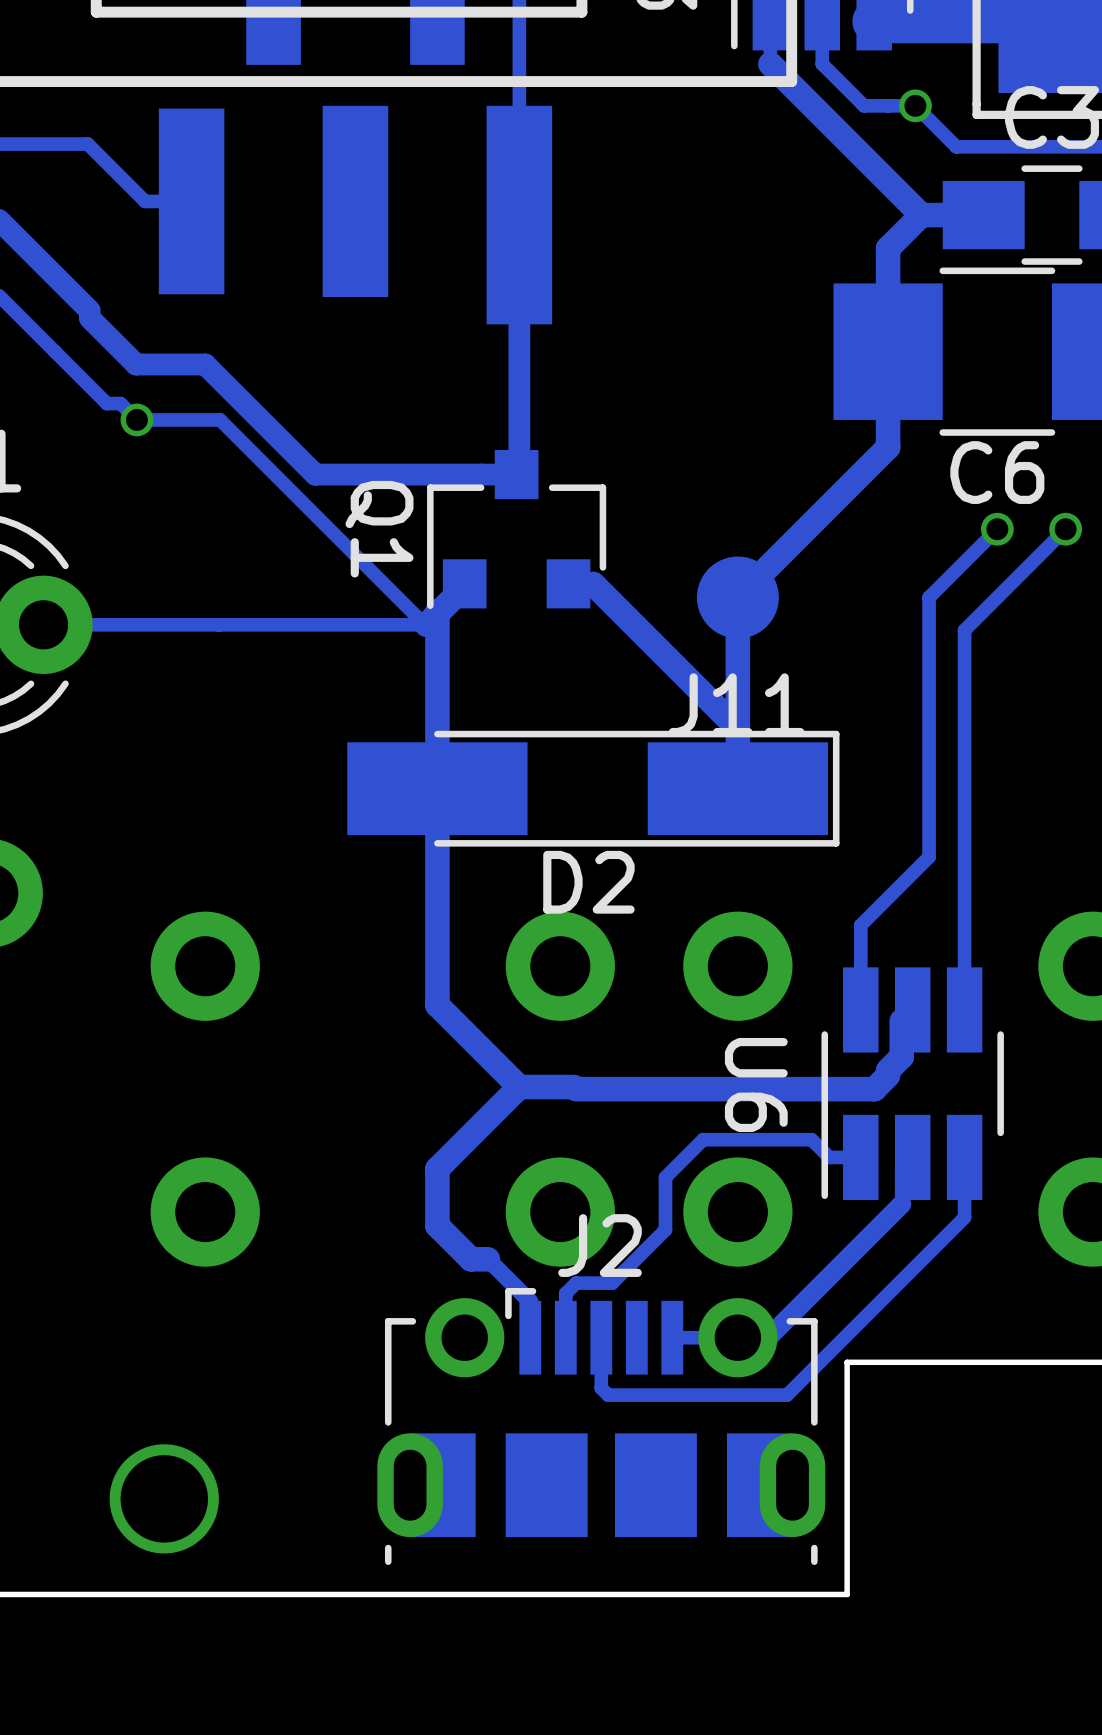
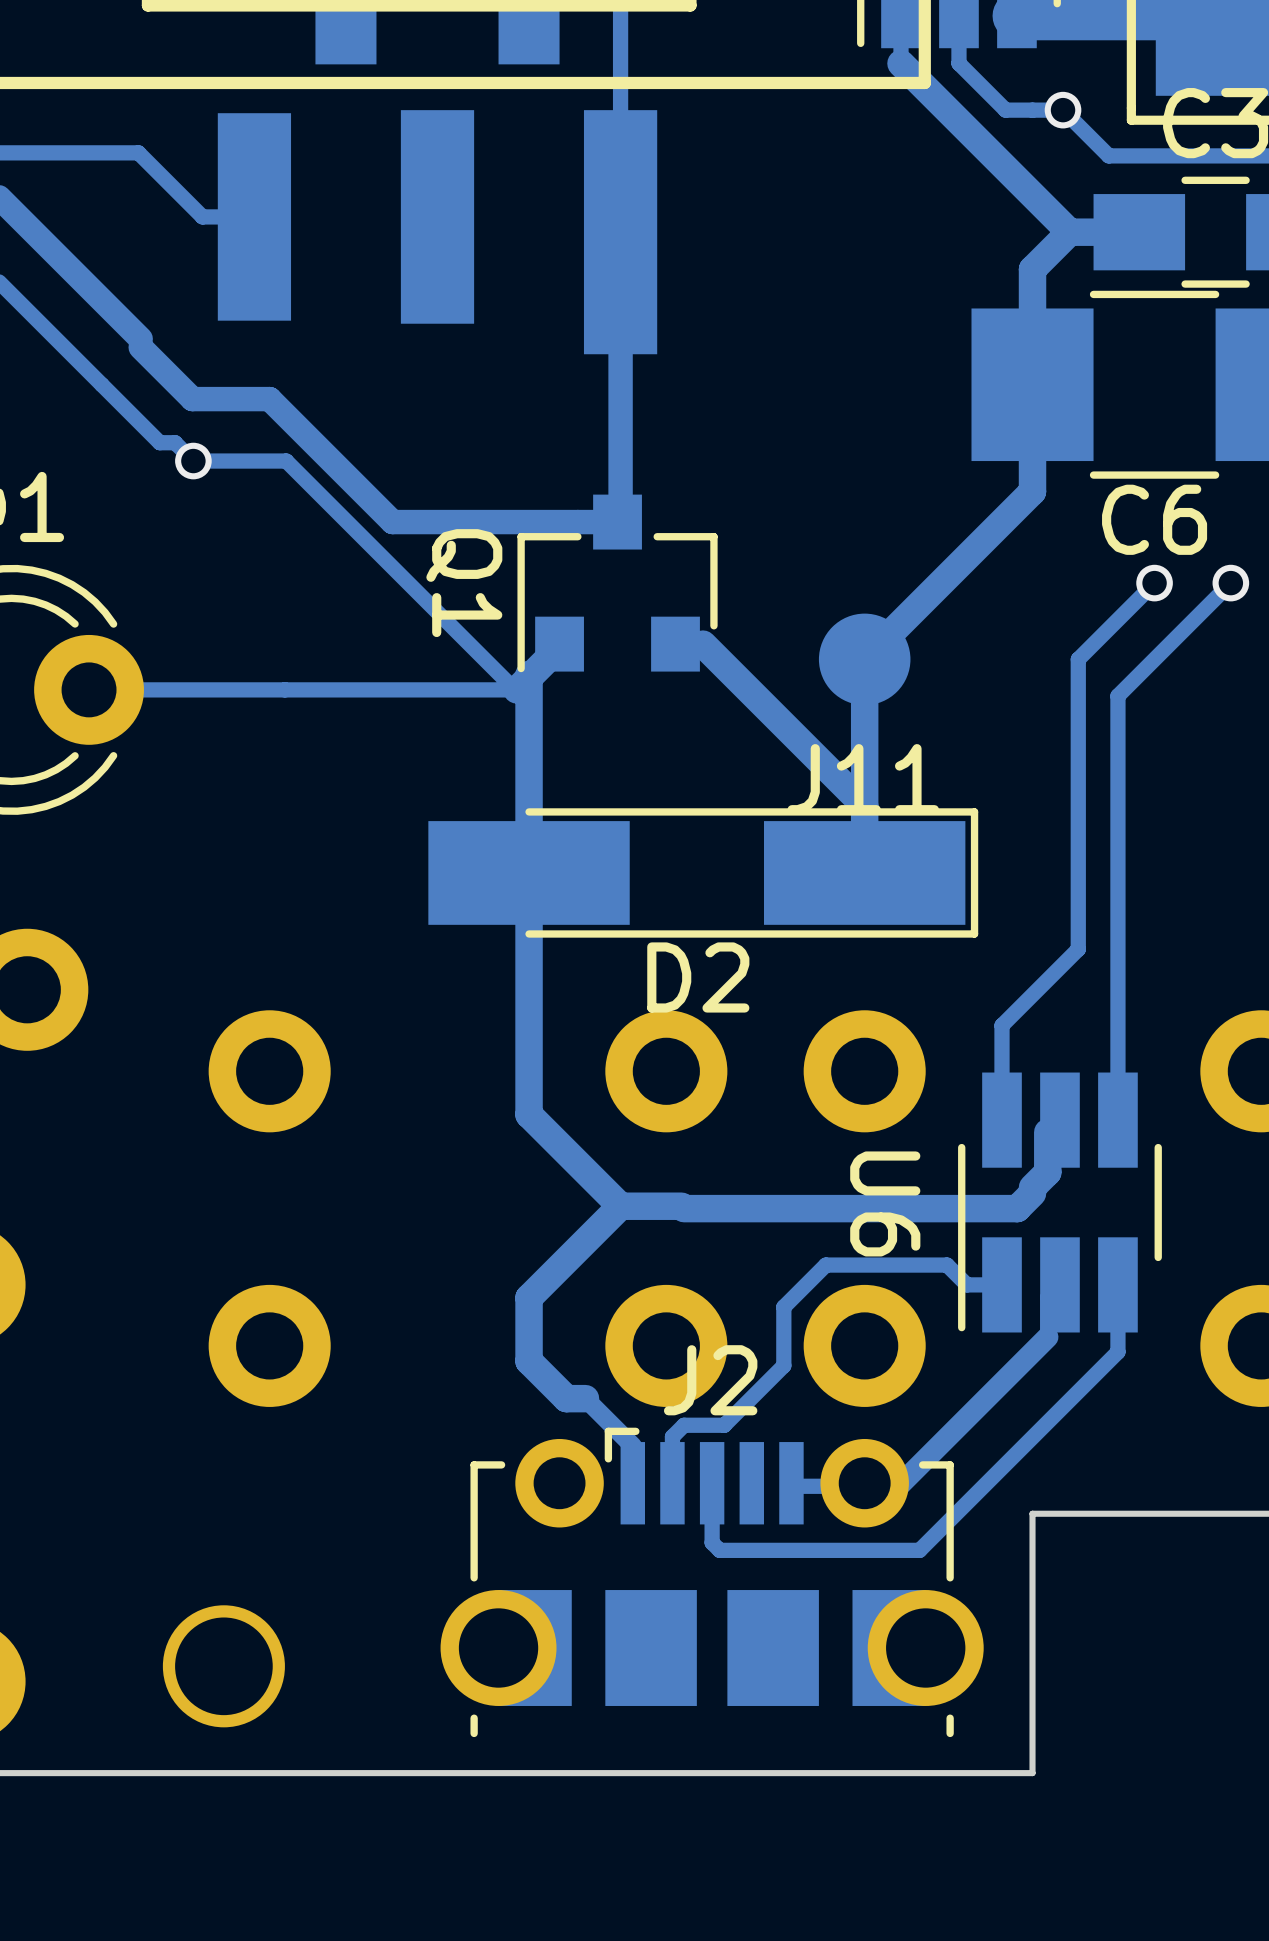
J2 footprint: [377, 1288, 826, 1565] -> [440, 1427, 984, 1738]
board edge: (888, 1362) (847, 1362) (847, 1594) -> (1032, 1513) (1032, 1773) (986, 1773)

